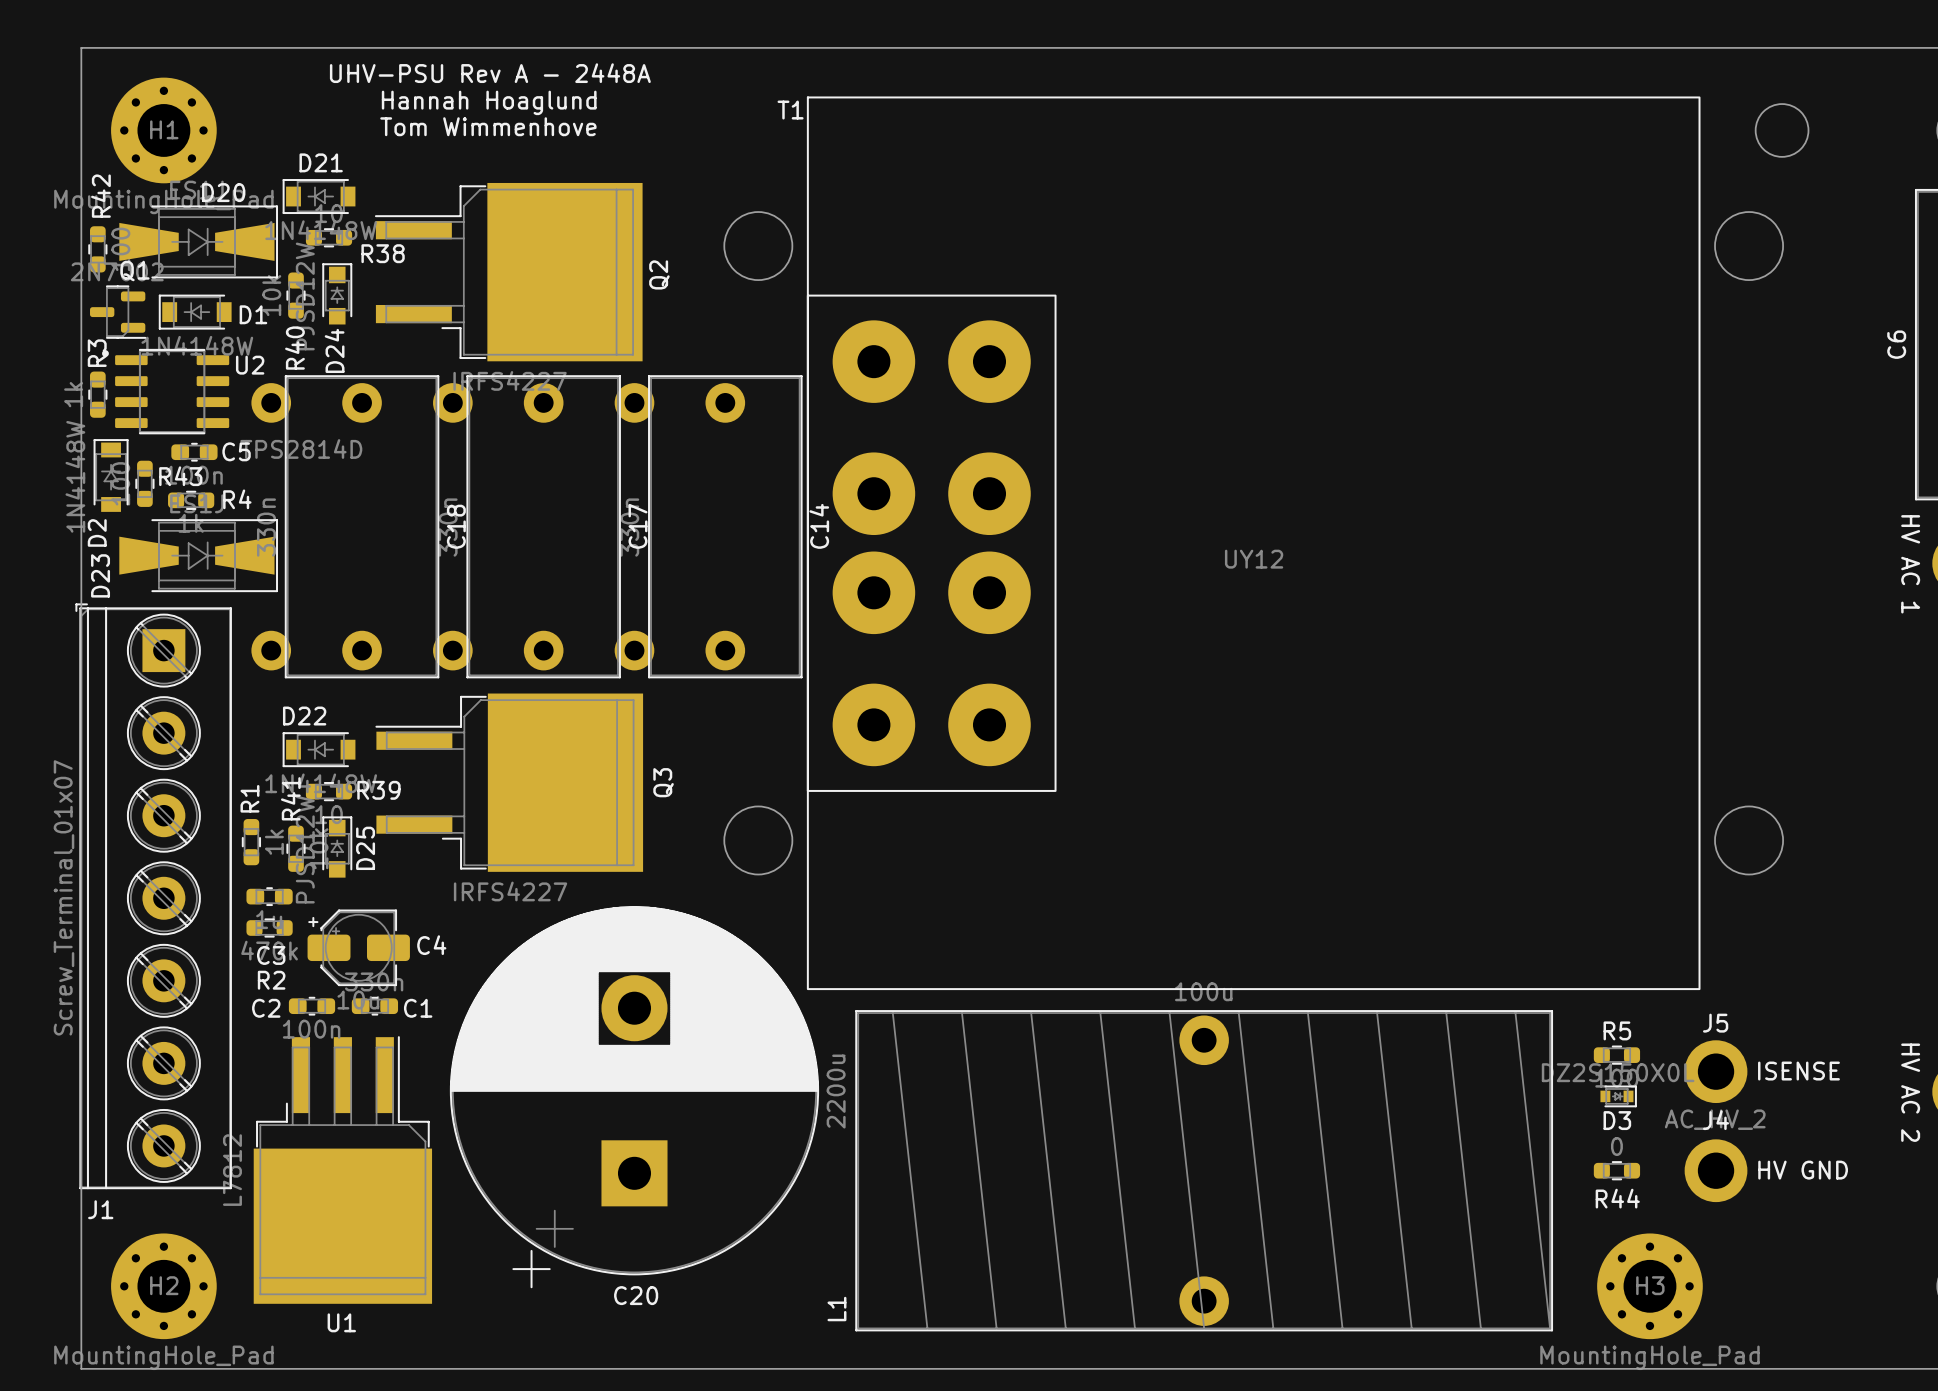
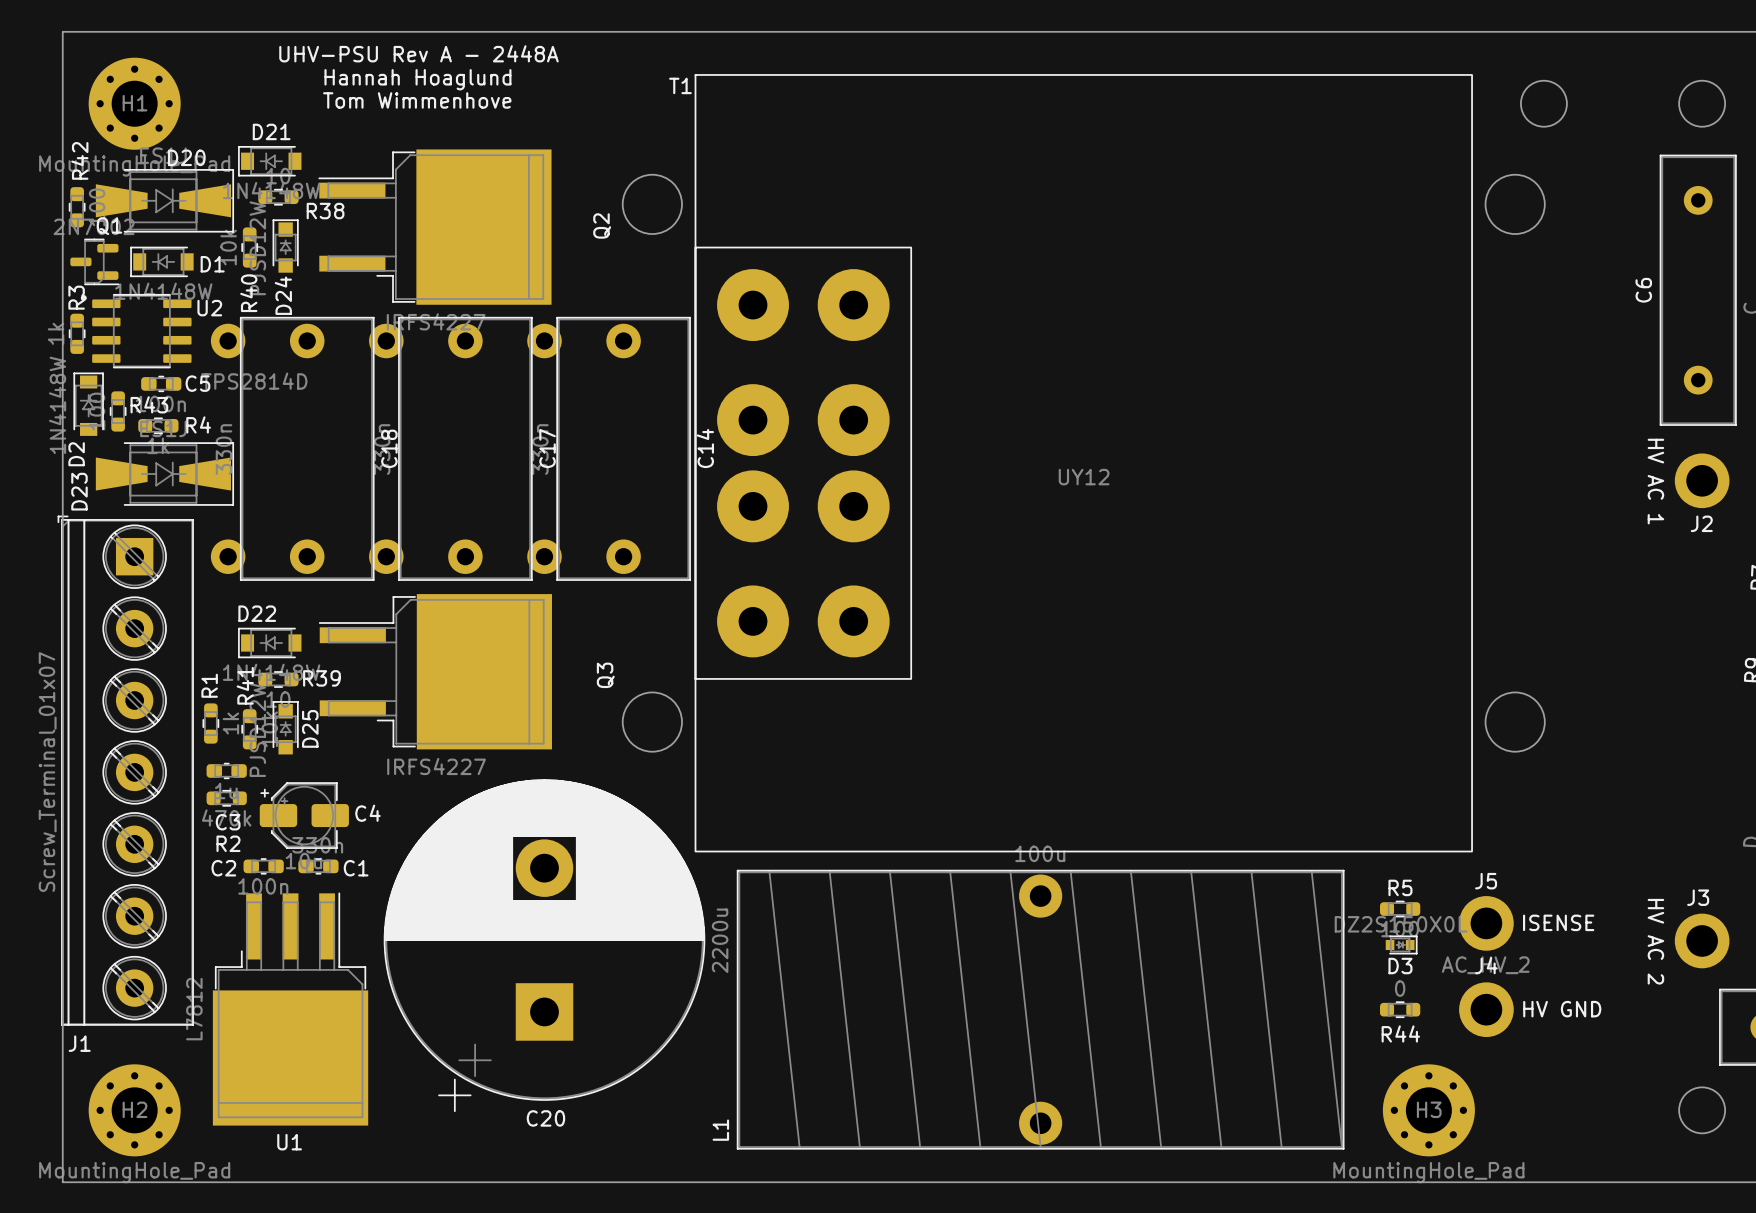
Q2 name position: Q2 (659, 274) -> Q2 (602, 225)
Q3 name position: Q3 (663, 782) -> Q3 (605, 675)

